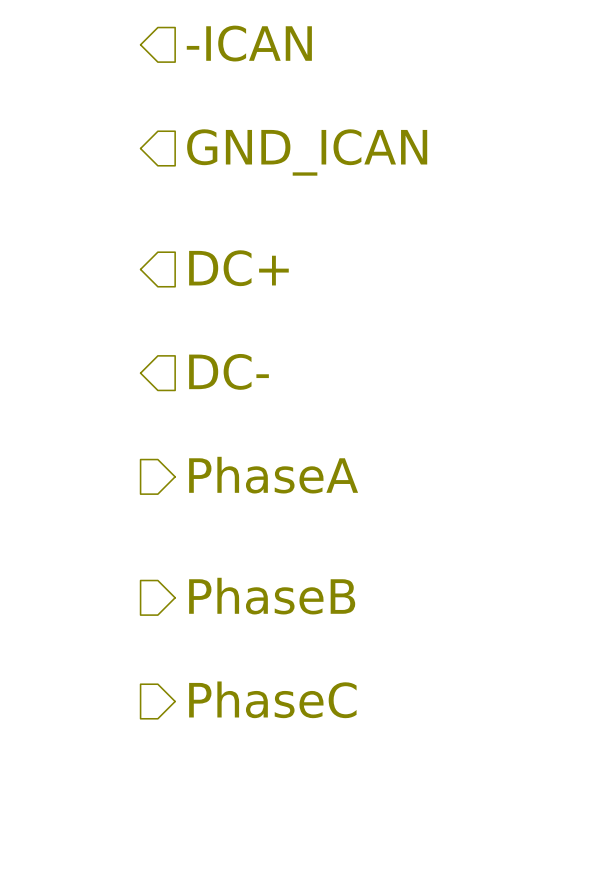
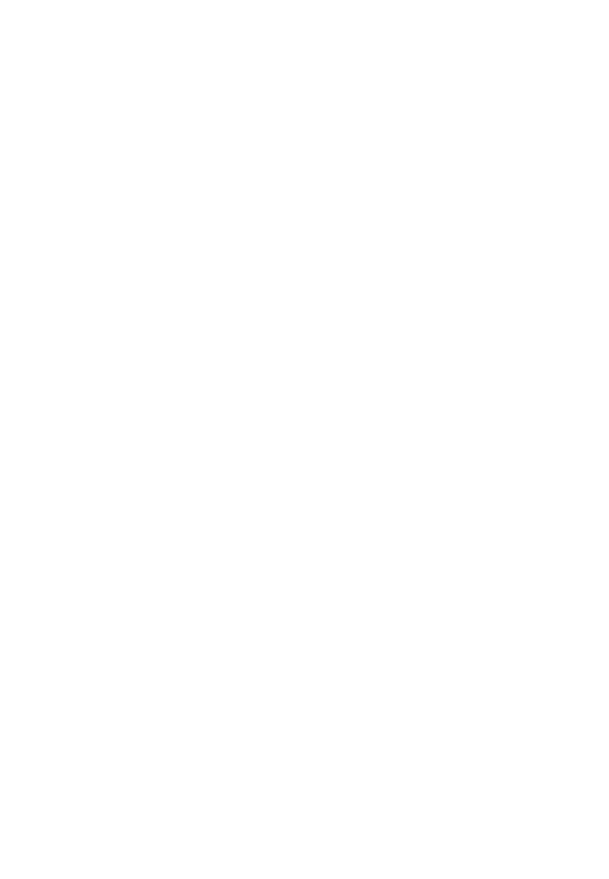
hierarchical label: -ICAN (249, 43) -> none
hierarchical label: GND_ICAN (307, 152) -> none
hierarchical label: DC+ (238, 268) -> none
hierarchical label: DC- (229, 371) -> none
hierarchical label: PhaseA (273, 475) -> none
hierarchical label: PhaseB (272, 596) -> none
hierarchical label: PhaseC (272, 699) -> none

